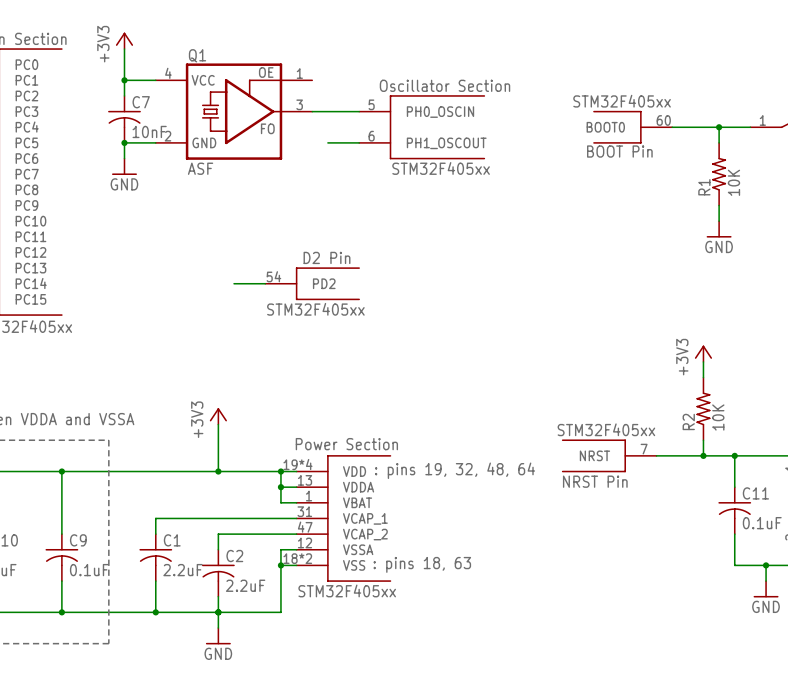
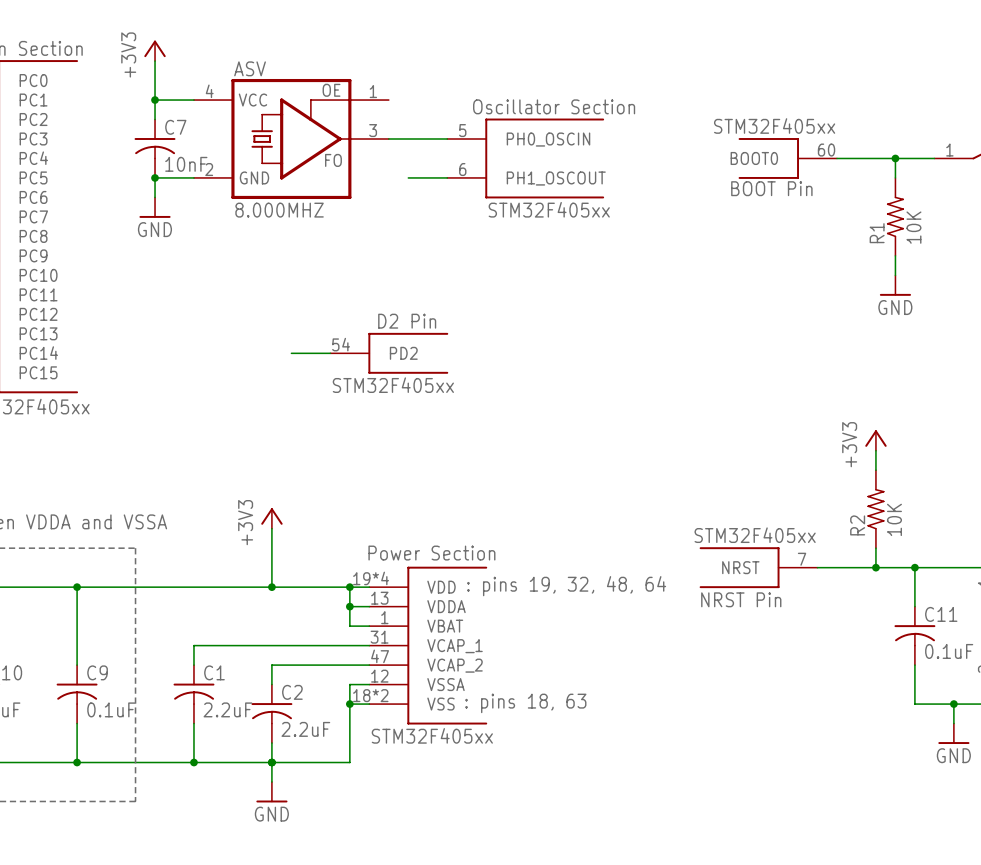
Q1 name: Q1 (197, 55) -> ASV (250, 68)
Q1 value: ASF (200, 168) -> 8.000MHZ (279, 210)

